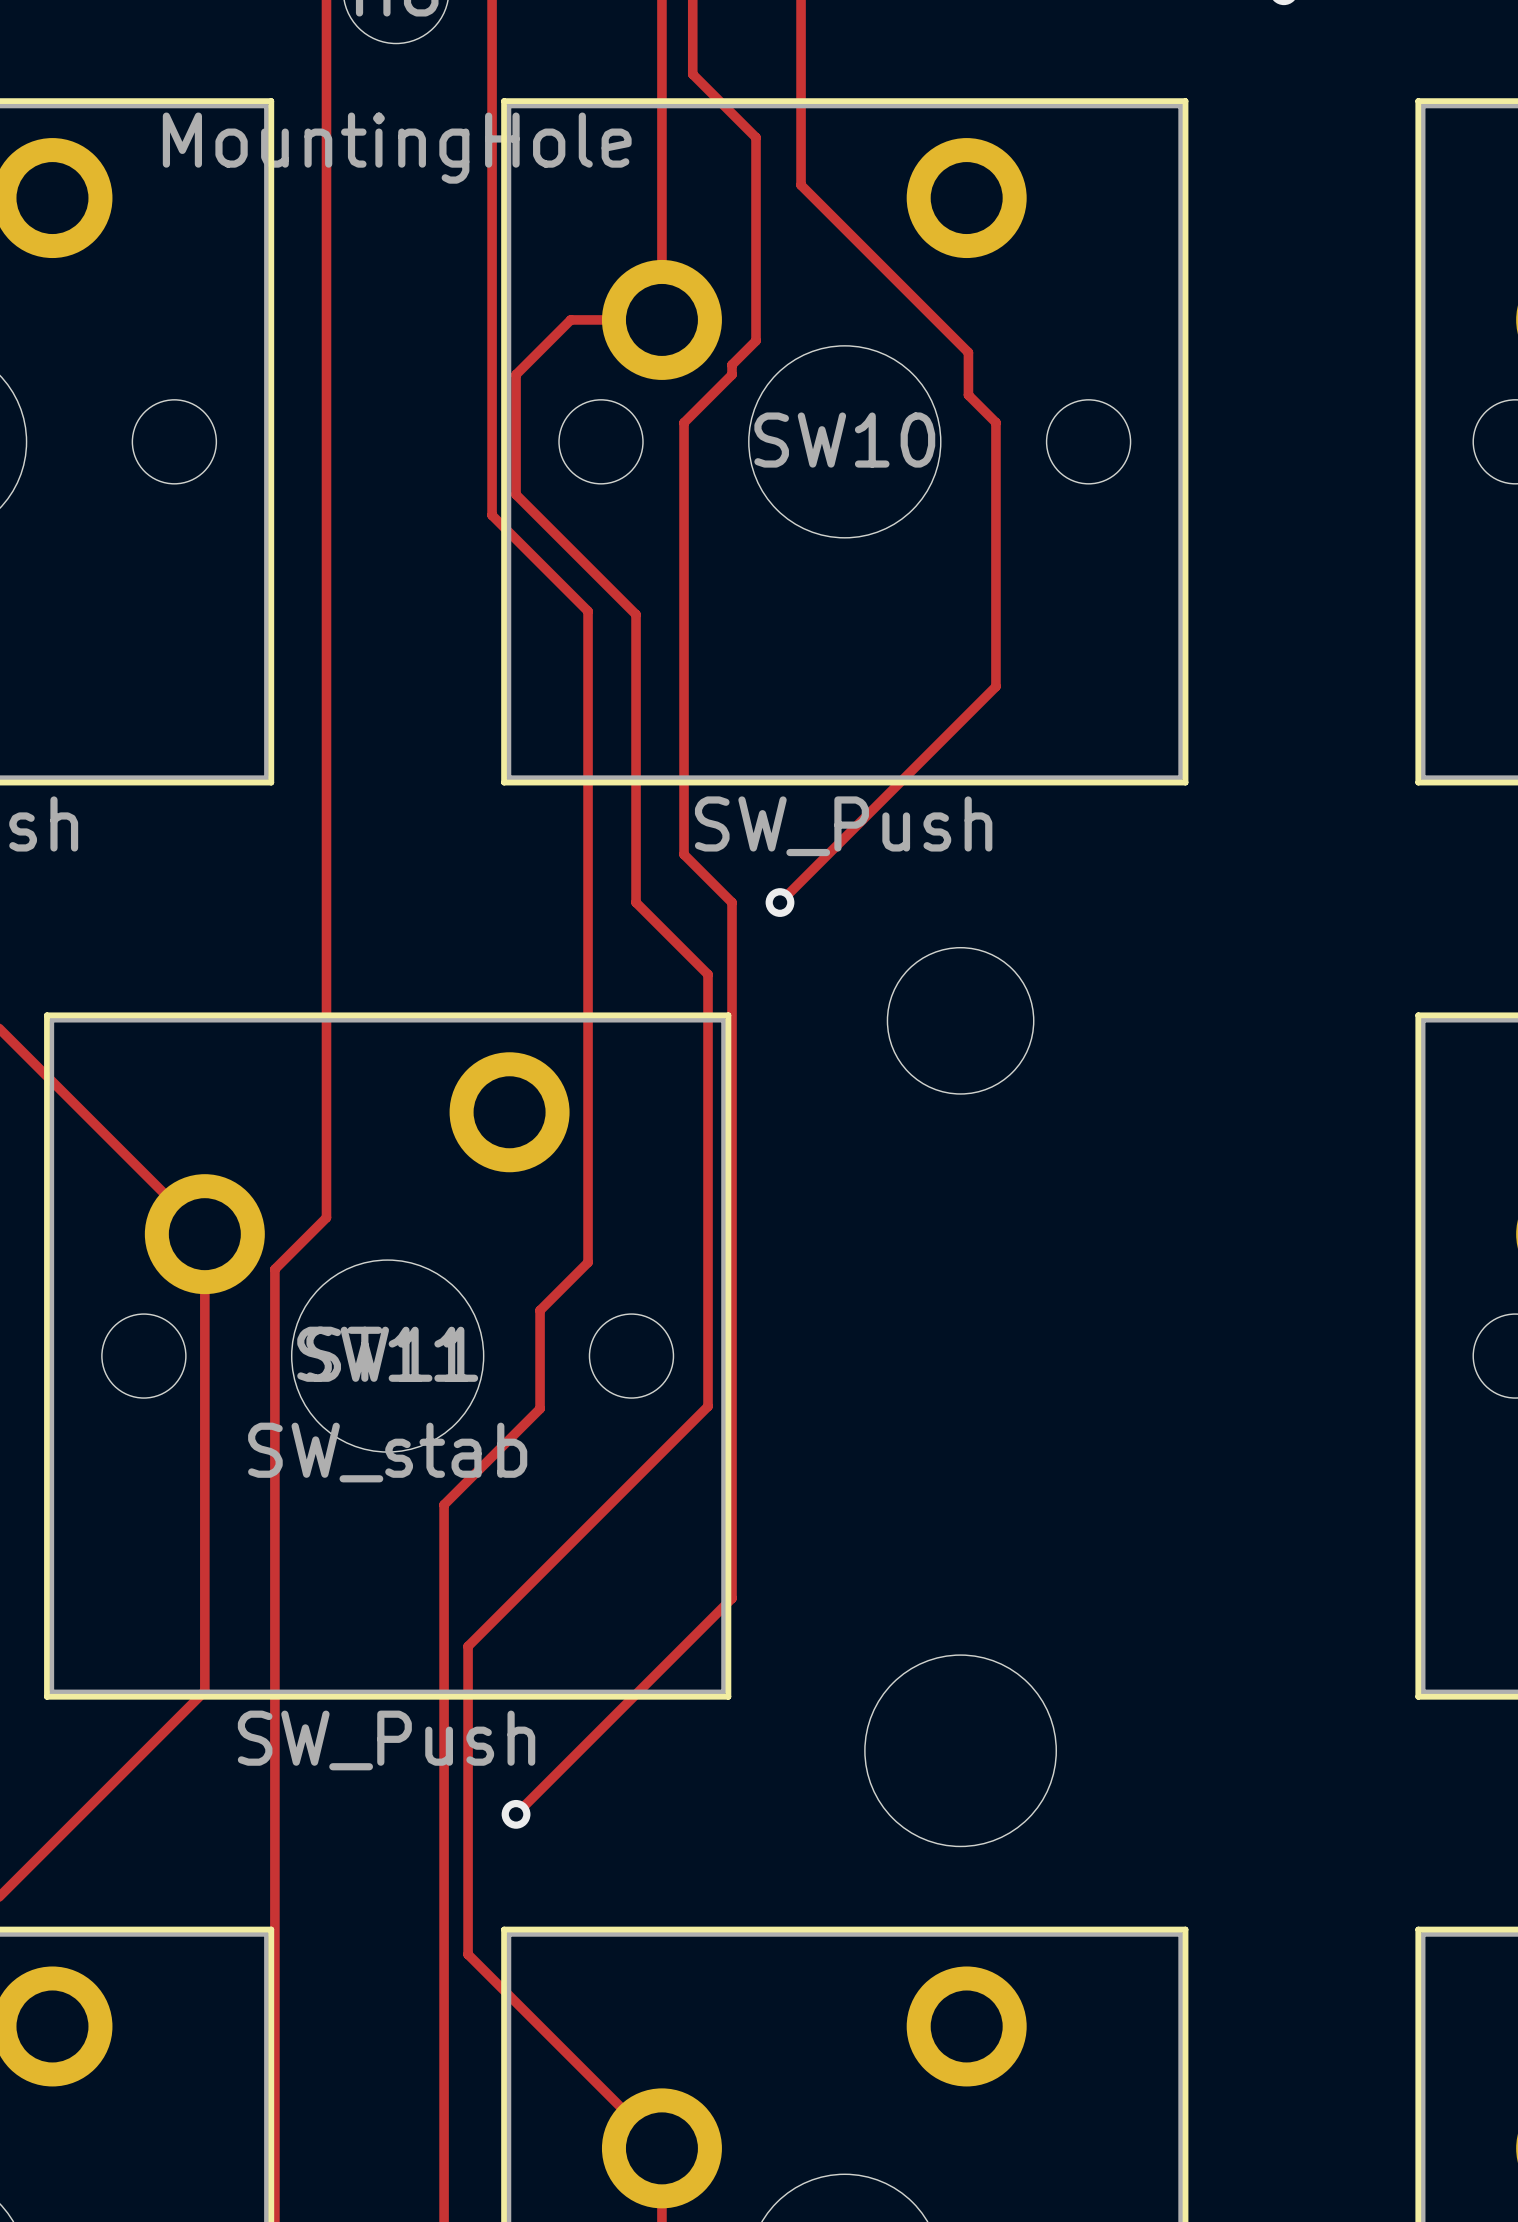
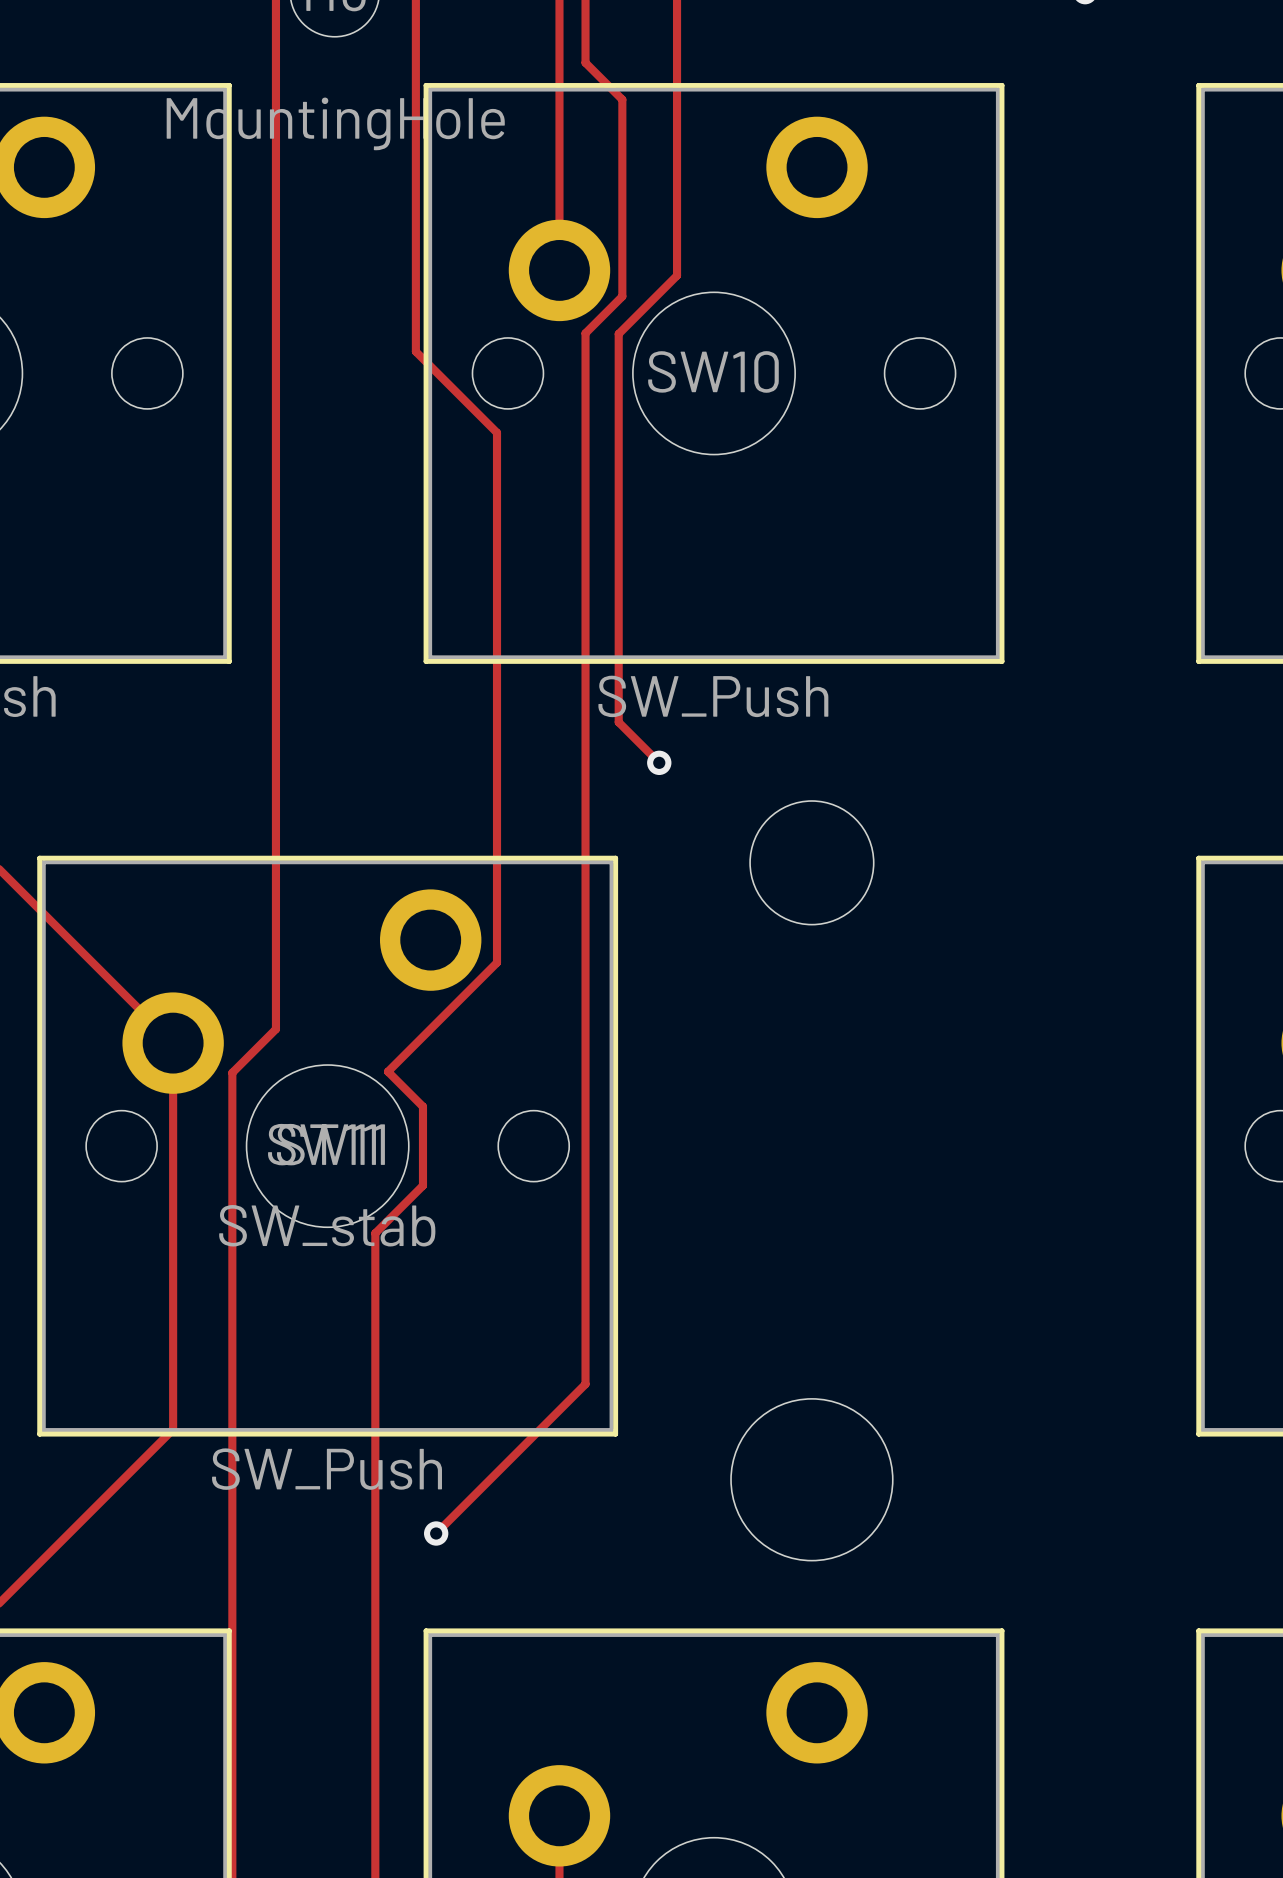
track: (736, 117) (756, 137) (756, 340) (732, 364) (732, 374) (684, 422) (684, 854) (732, 902) (732, 1598) (692, 1637) -> (622, 99) (622, 296) (585, 333) (585, 1384)
track: (801, 185) (968, 352) (968, 395) (995, 422) (995, 686) (780, 902) -> (677, 156) (677, 275) (618, 333) (618, 722) (659, 762)
track: (661, 319) (570, 319) (516, 374) (516, 494) (636, 614) (636, 902) (708, 974) (708, 1406) (468, 1646) (468, 1954) (661, 2148) -> none
track: (492, 416) (492, 515) (588, 611) -> (415, 351) (497, 432) (497, 516)
track: (588, 1138) (588, 1262) (540, 1310) (540, 1408) (444, 1504) -> (497, 962) (388, 1071) (422, 1106) (422, 1185) (375, 1233) (375, 1271)

